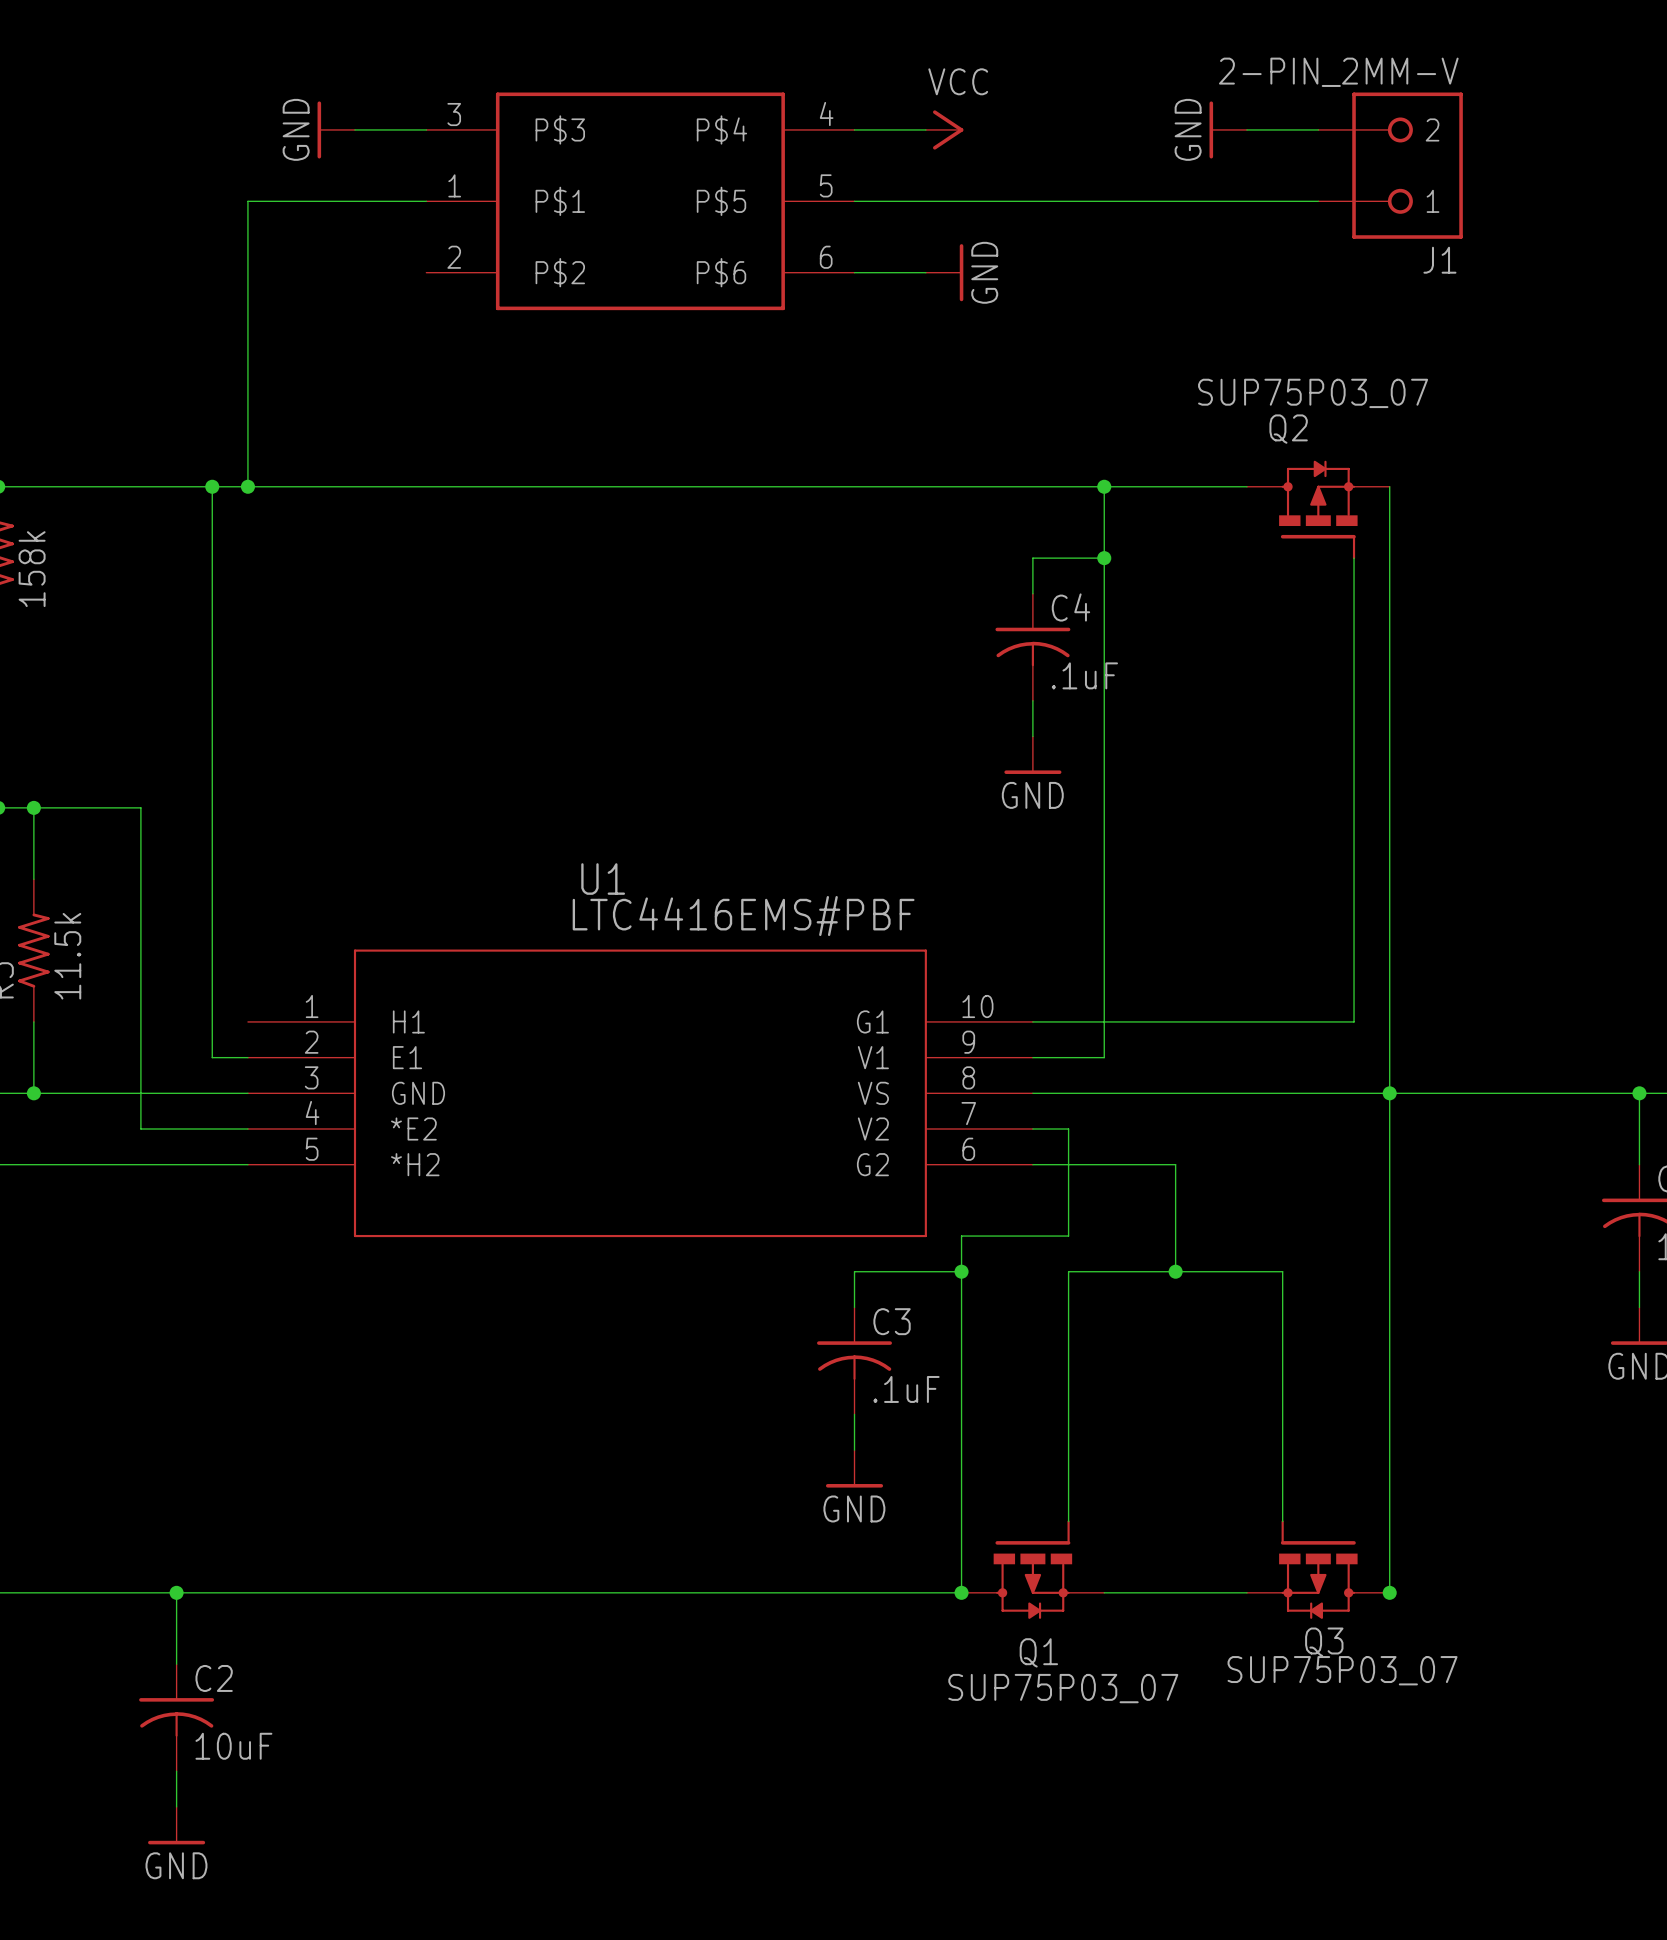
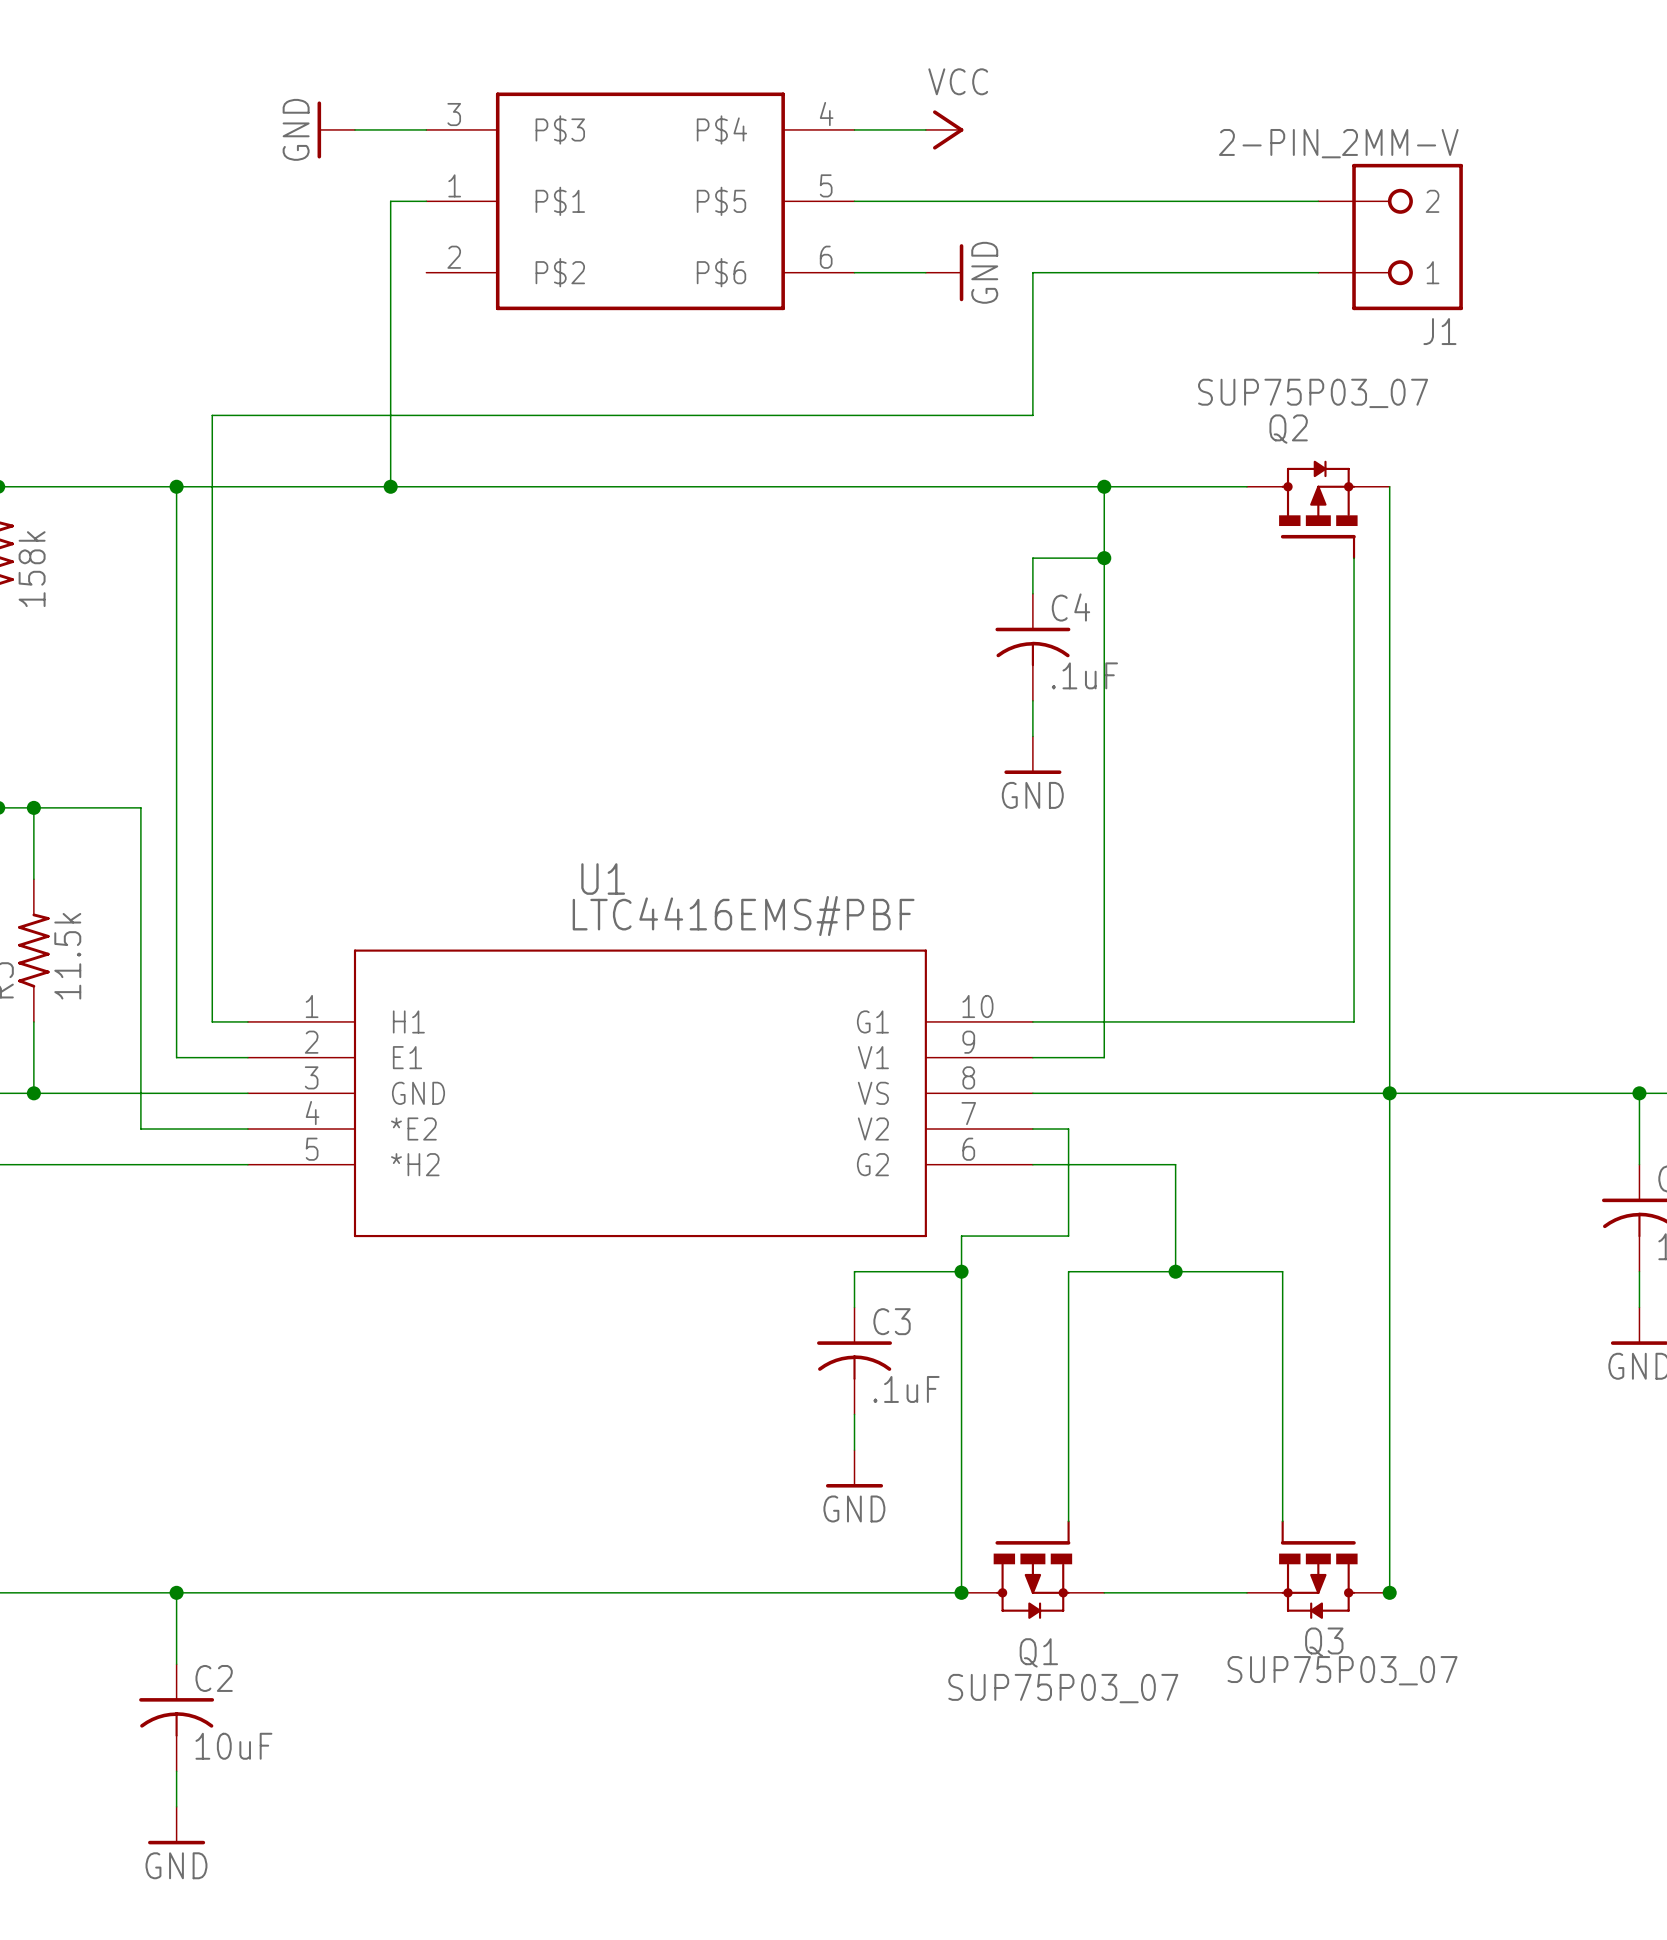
power symbol: GND (1228, 129) -> none
wire: (1246, 129) (1318, 129) -> none
J1 position: (1390, 165) -> (1390, 237)
wire: (390, 201) (247, 201) (247, 486) -> (390, 201) (390, 486)
wire: none -> (1318, 272) (1032, 272) (1032, 415) (212, 415) (212, 486)
wire: none -> (176, 486) (176, 1057) (212, 1057)
junction: none -> (176, 486)
junction: (212, 486) -> none
junction: (247, 486) -> none
junction: none -> (390, 486)
wire: (212, 1021) (212, 1057) -> (212, 1021) (247, 1021)

